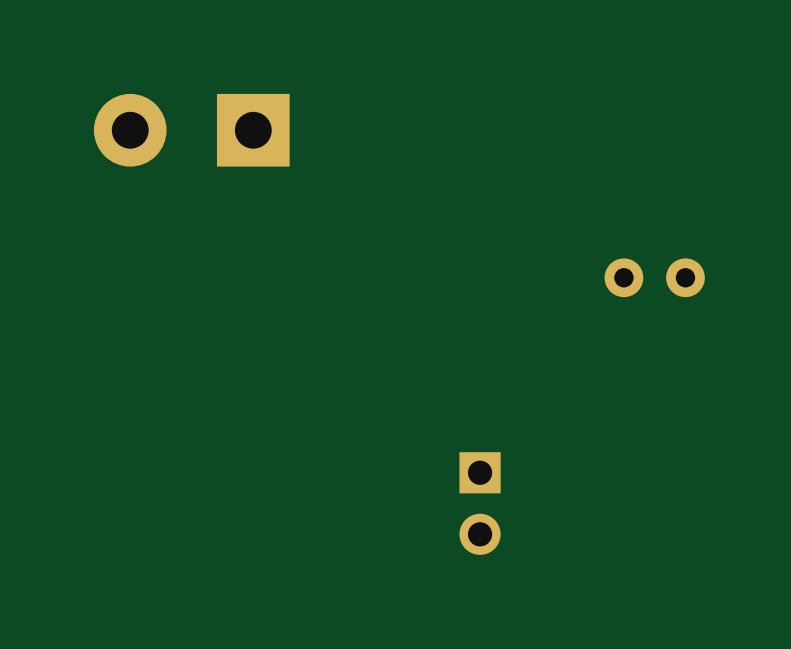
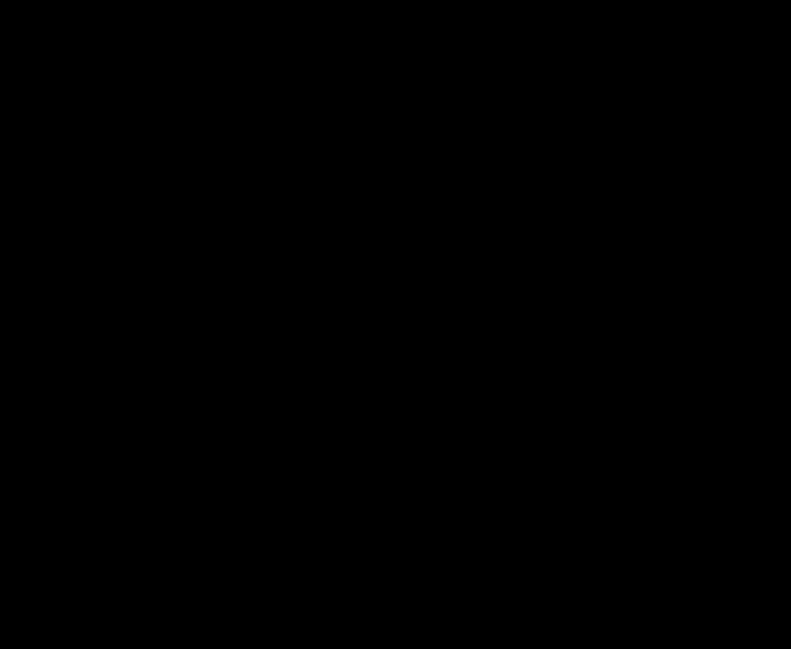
part: (191, 130) -> none
part: (654, 277) -> none
part: (480, 503) -> none

